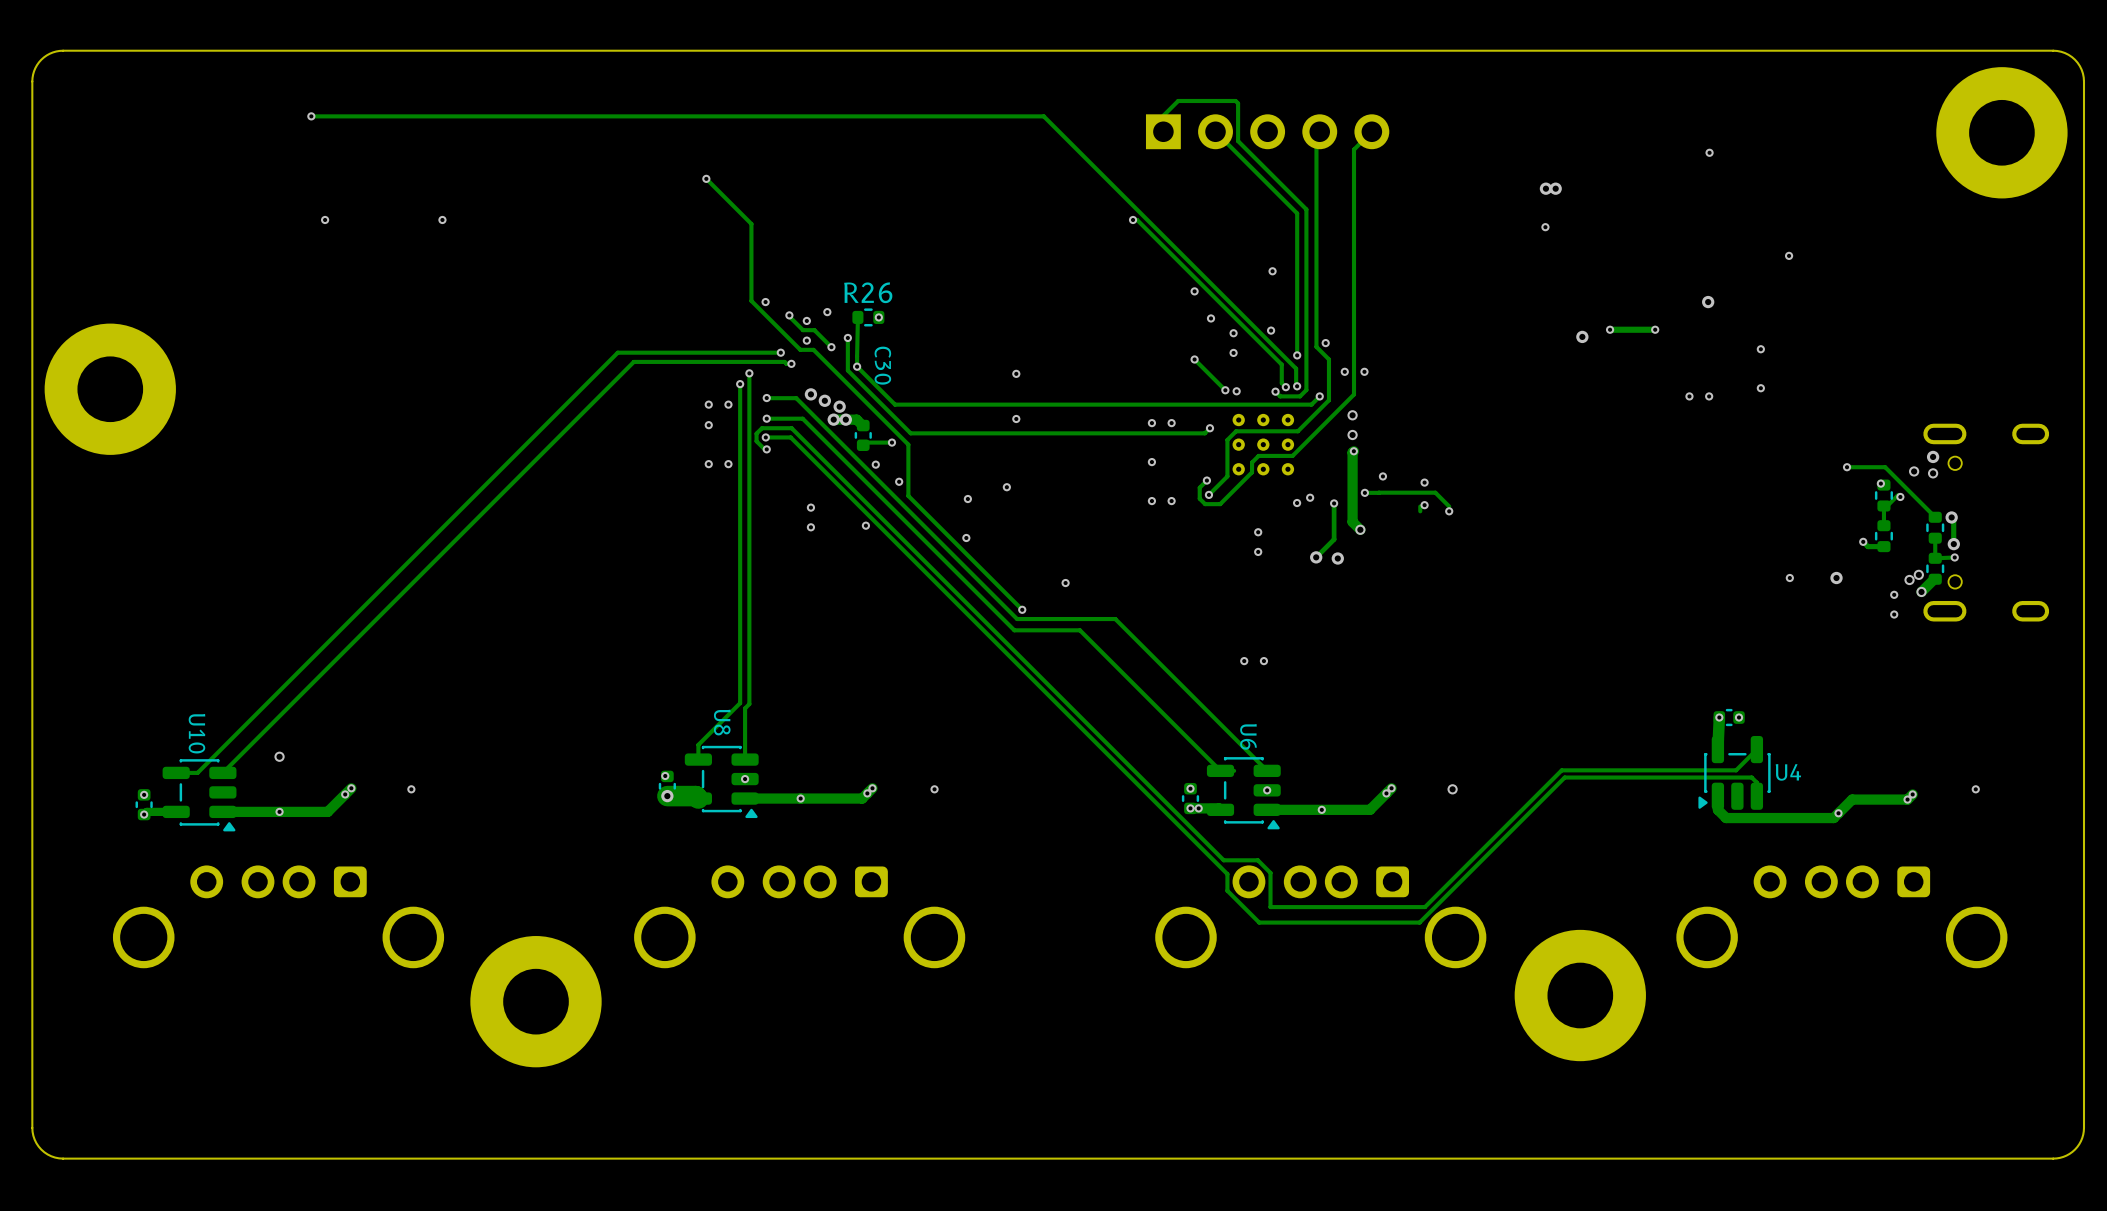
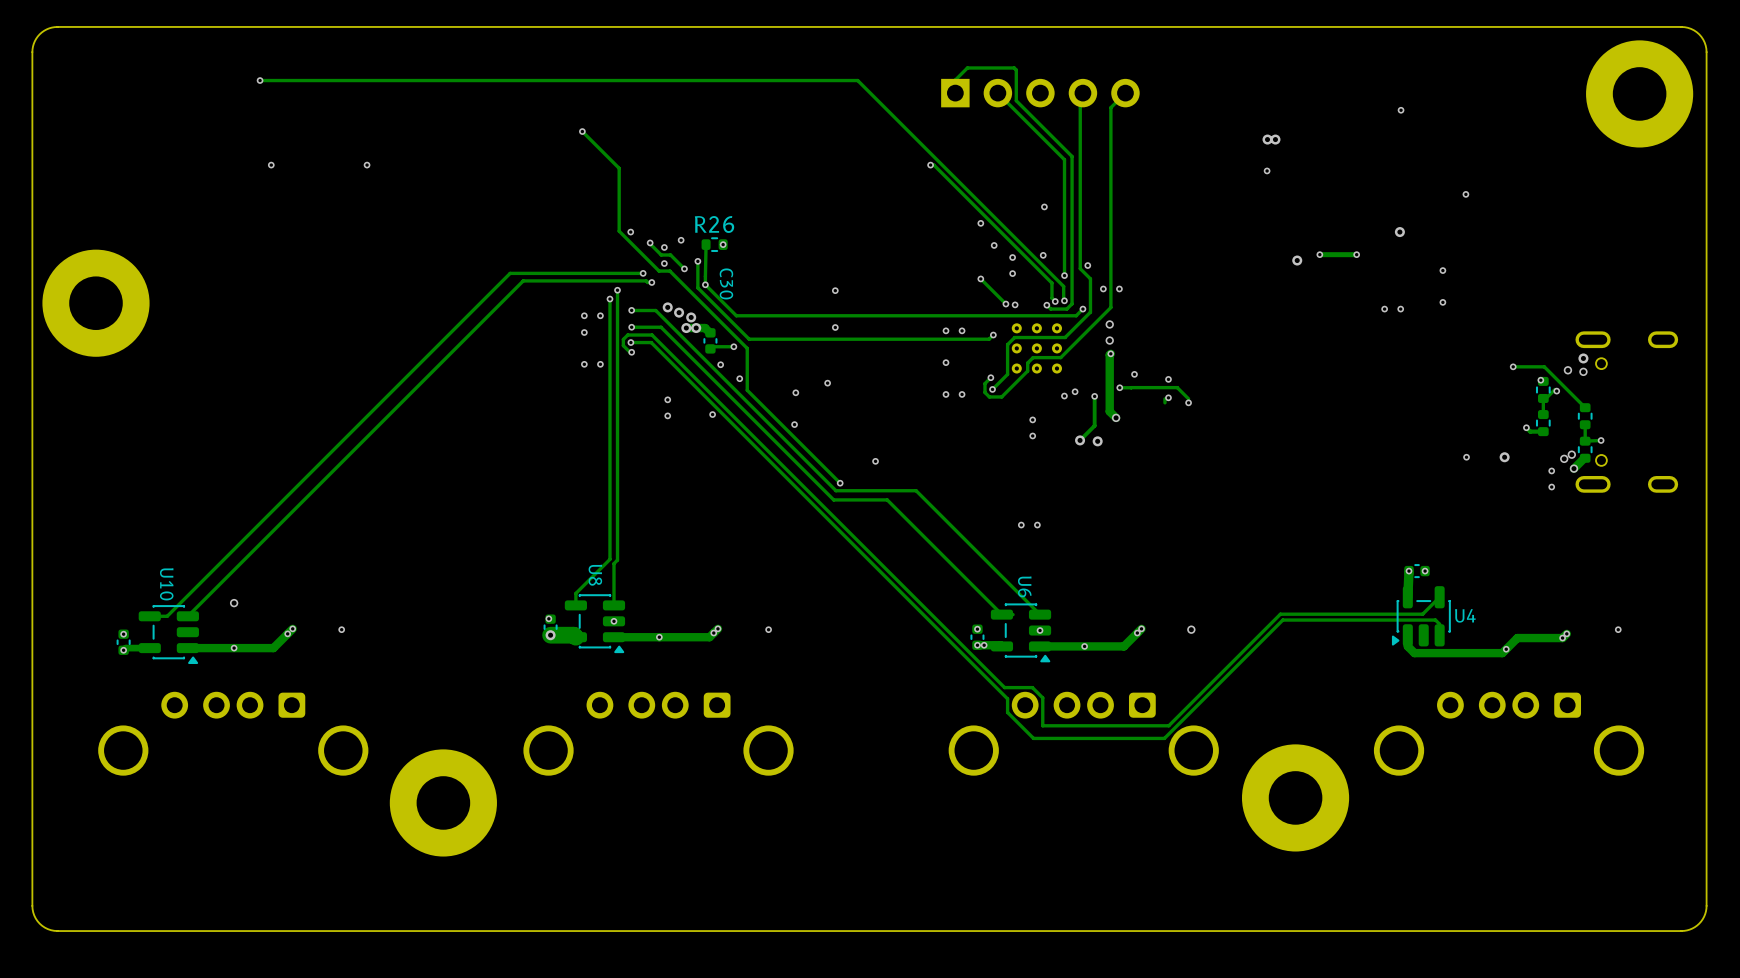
track: (1951, 517) (1953, 519) (1953, 544) -> none
via: (1951, 517) -> none
via: (1953, 544) -> none

